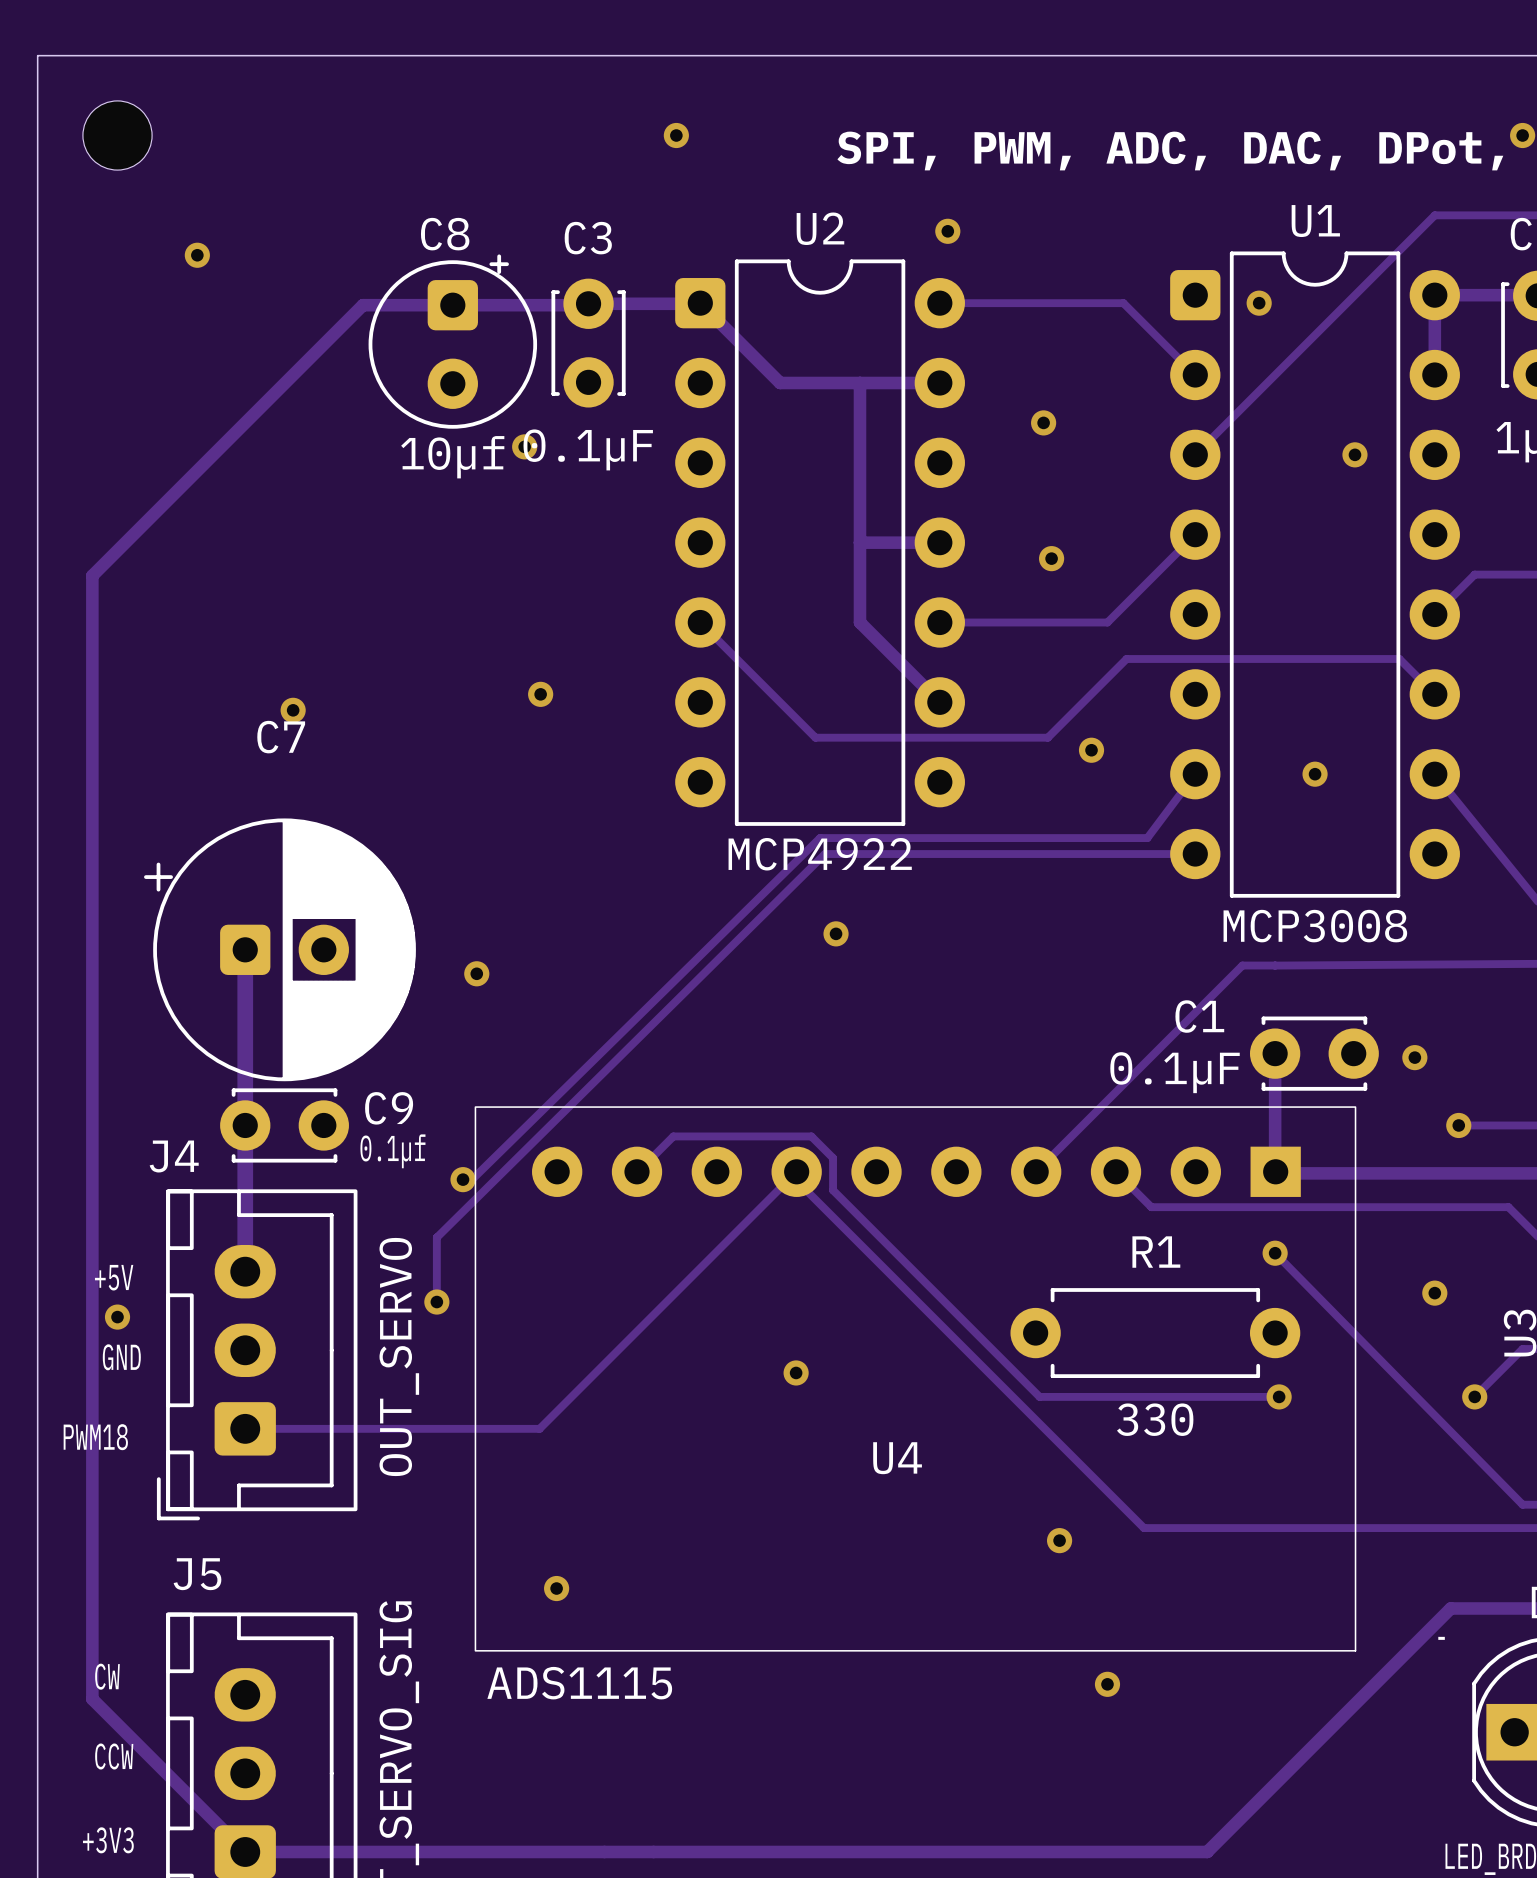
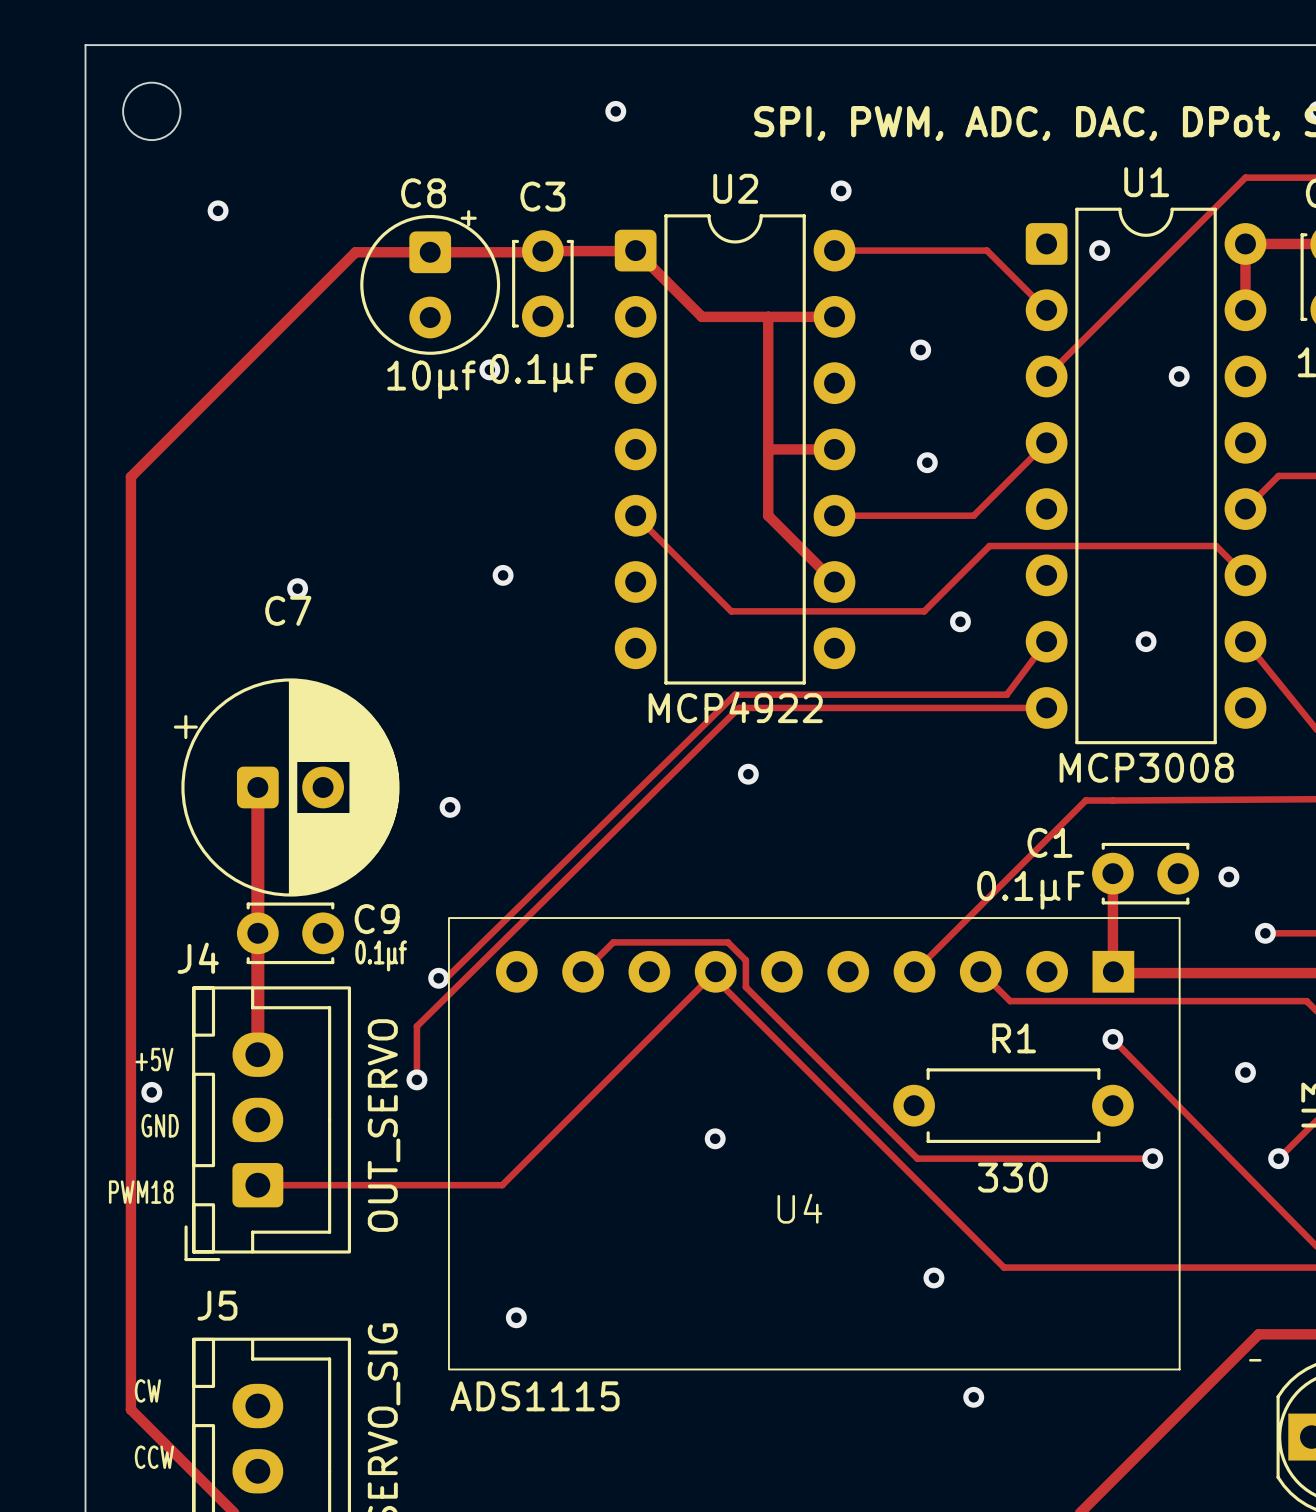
track: none -> (1116, 1158) (1152, 1158)
via position: (1279, 1396) -> (1152, 1158)

